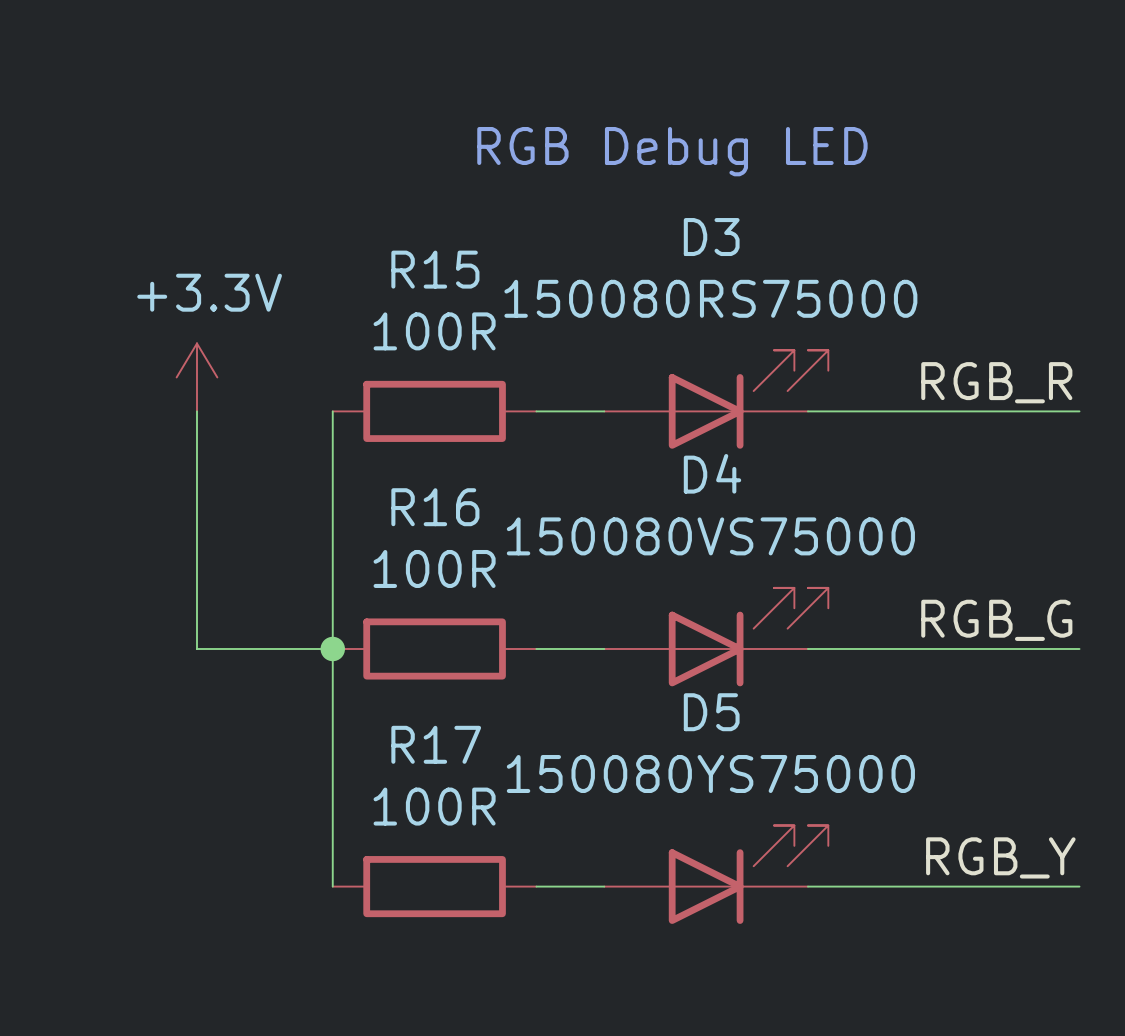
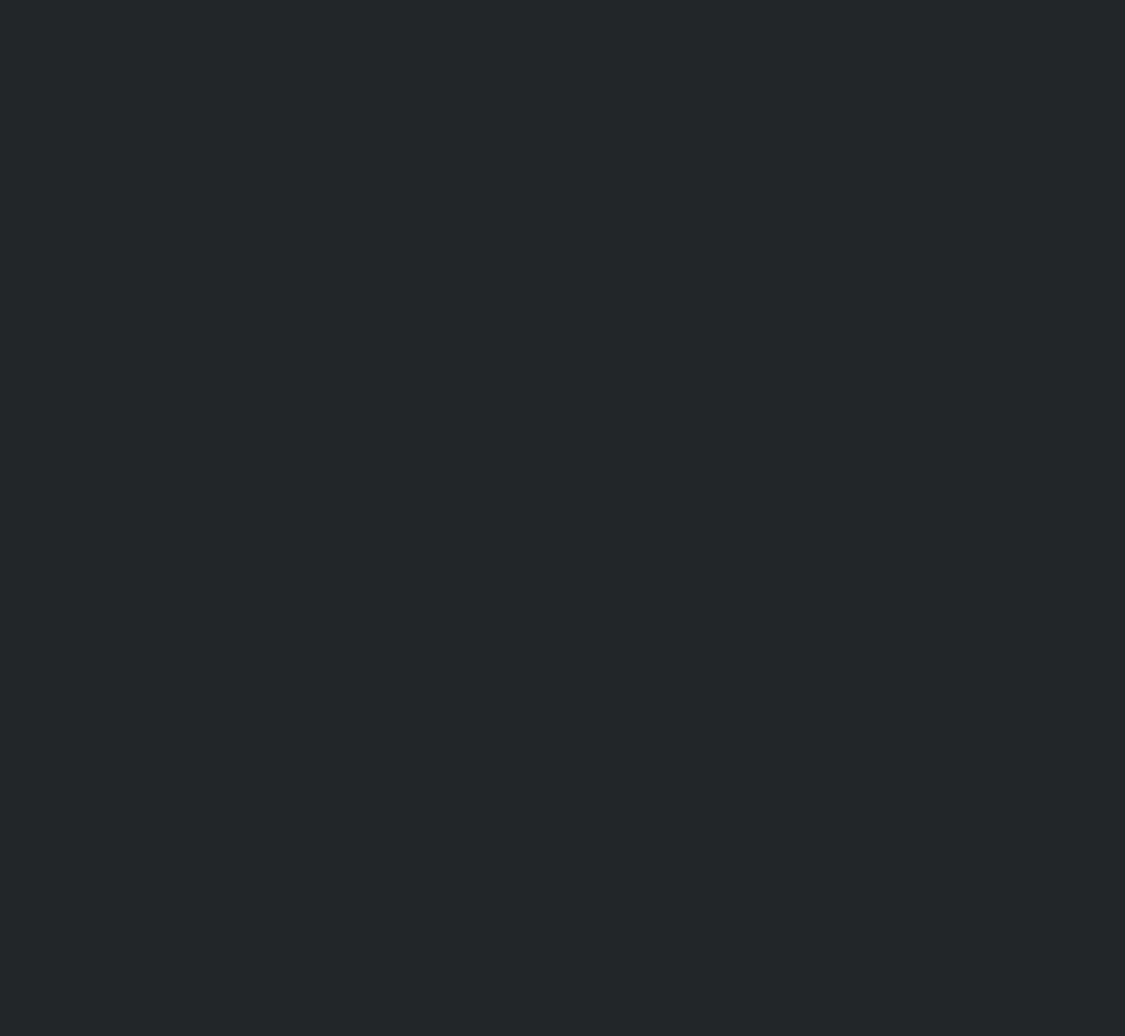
text: RGB Debug LED (672, 151) -> none
power symbol: +3.3V (196, 377) -> none
label: RGB_R (996, 382) -> none
D3: 150080RS75000 (716, 399) -> none
wire: (196, 411) (196, 648) (332, 648) -> none
wire: (332, 411) (332, 886) -> none
R15: 100R (434, 411) -> none
wire: (536, 411) (604, 411) -> none
wire: (807, 411) (1079, 411) -> none
label: RGB_G (996, 620) -> none
D4: 150080VS75000 (716, 637) -> none
junction: (332, 648) -> none
R16: 100R (434, 648) -> none
wire: (536, 648) (604, 648) -> none
wire: (807, 648) (1079, 648) -> none
label: RGB_Y (1000, 857) -> none
D5: 150080YS75000 (716, 874) -> none
R17: 100R (434, 886) -> none
wire: (536, 886) (604, 886) -> none
wire: (807, 886) (1079, 886) -> none

